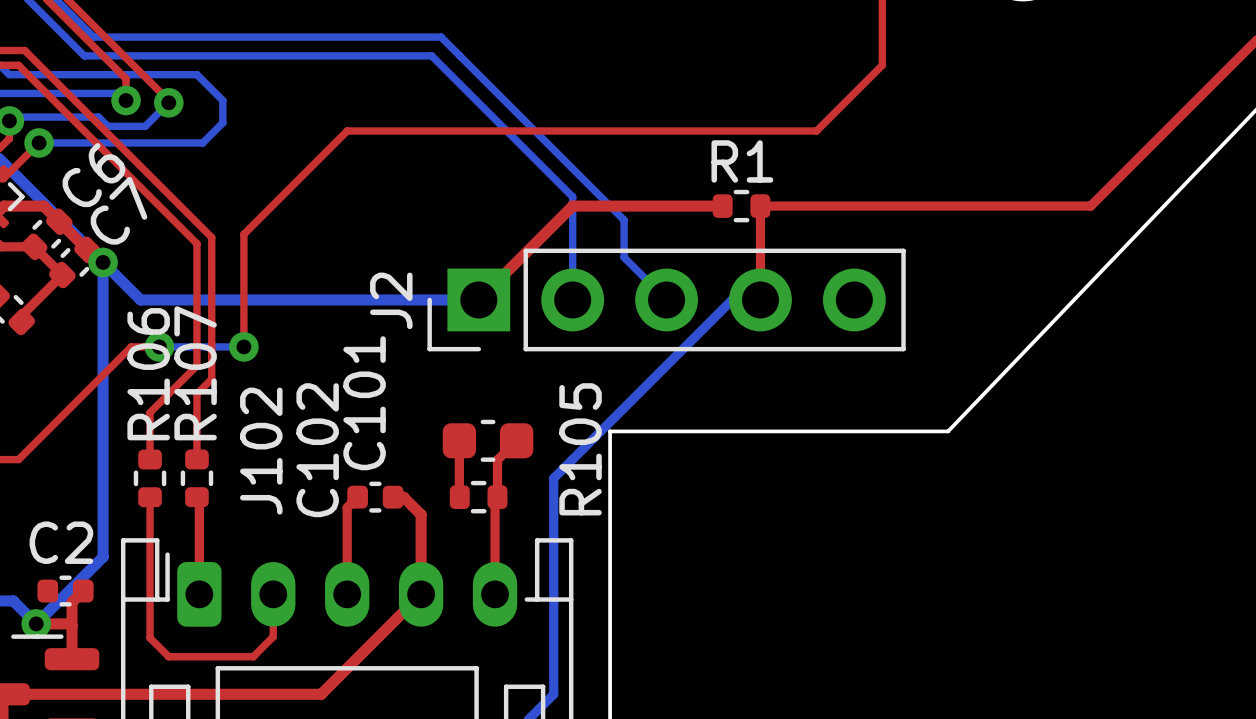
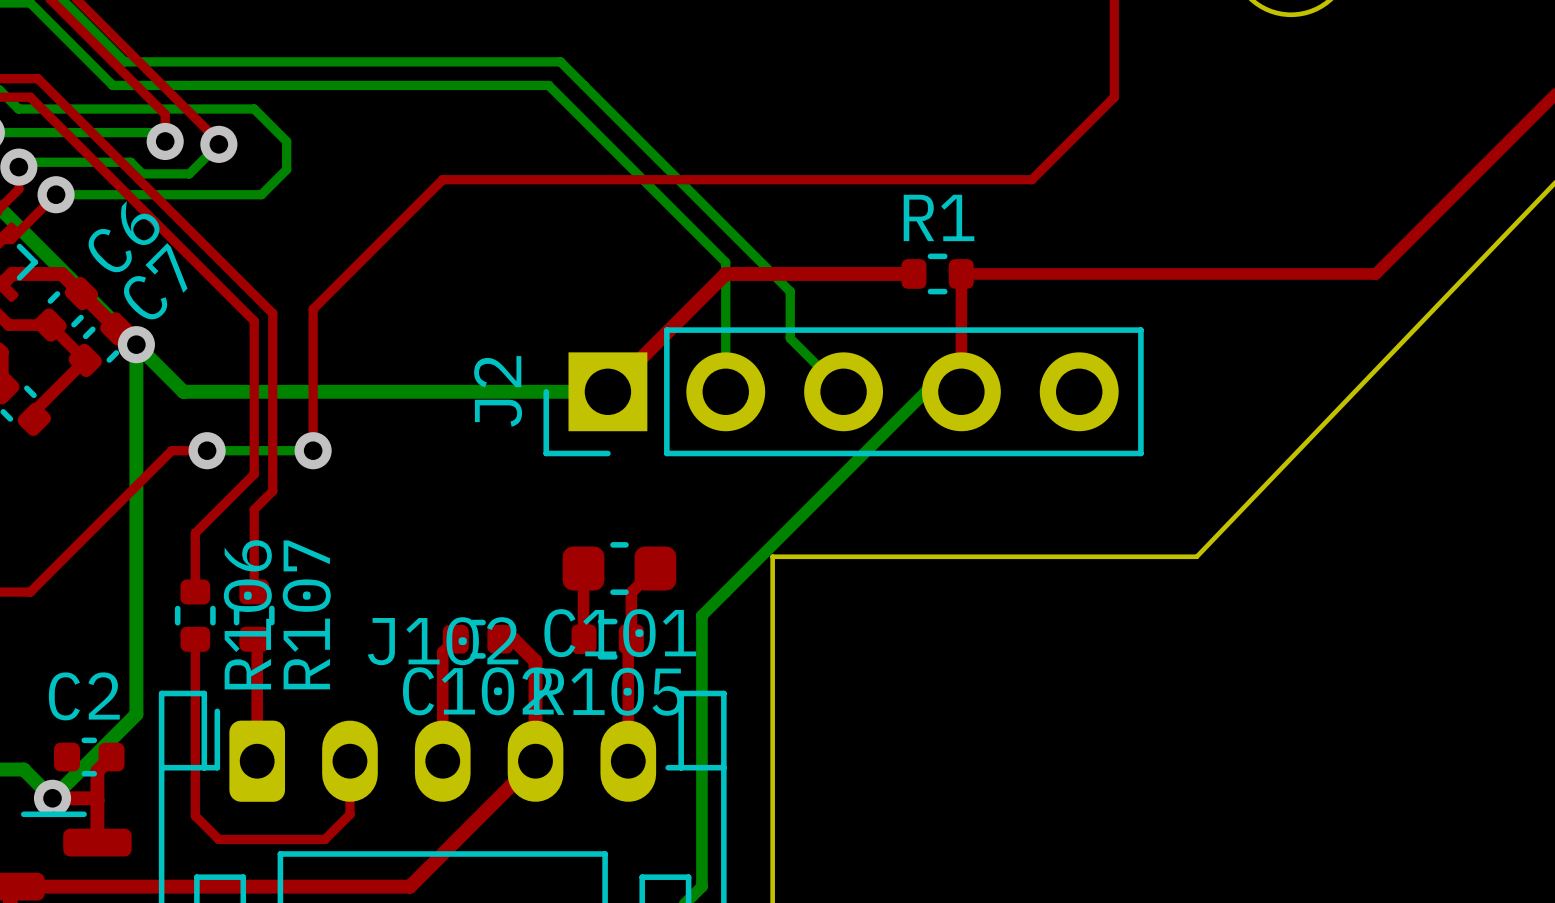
R107 name position: R107 (195, 373) -> R107 (306, 614)
R106 name position: R106 (148, 374) -> R106 (247, 614)
C101 name rotation: 0° (364, 403) -> 90° clockwise (620, 633)
R105 name rotation: 0° (580, 449) -> 90° clockwise (608, 691)
C102 name rotation: 0° (317, 450) -> 90° clockwise (478, 691)
J102 name rotation: 0° (261, 451) -> 90° clockwise (443, 641)

